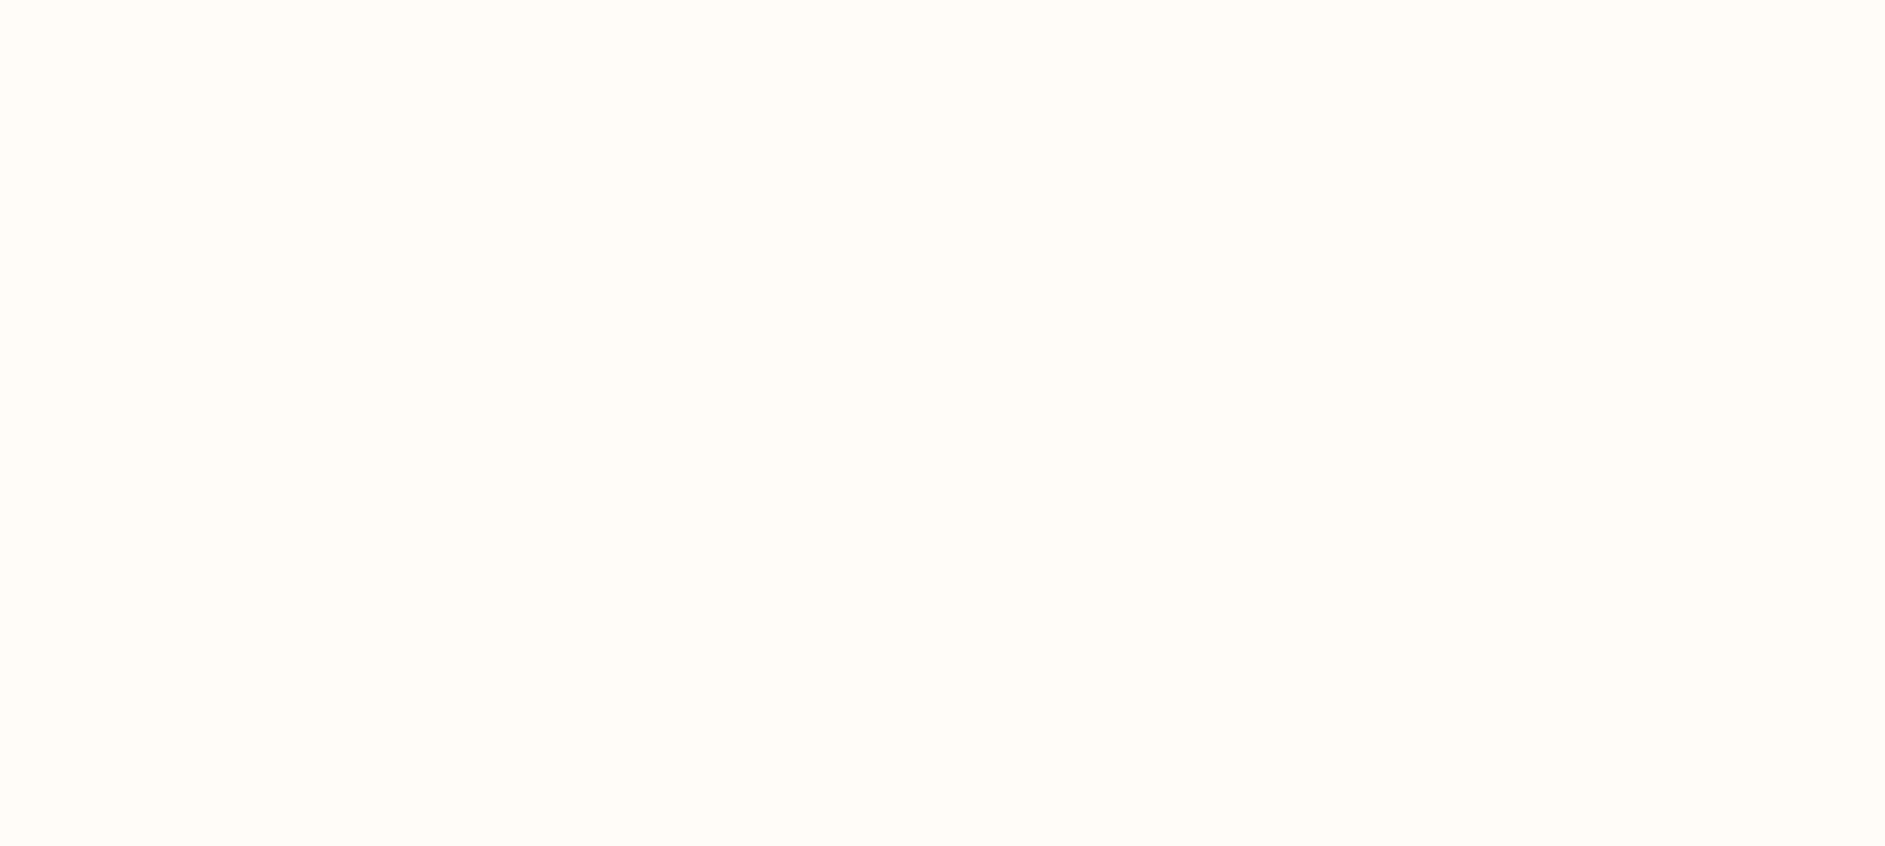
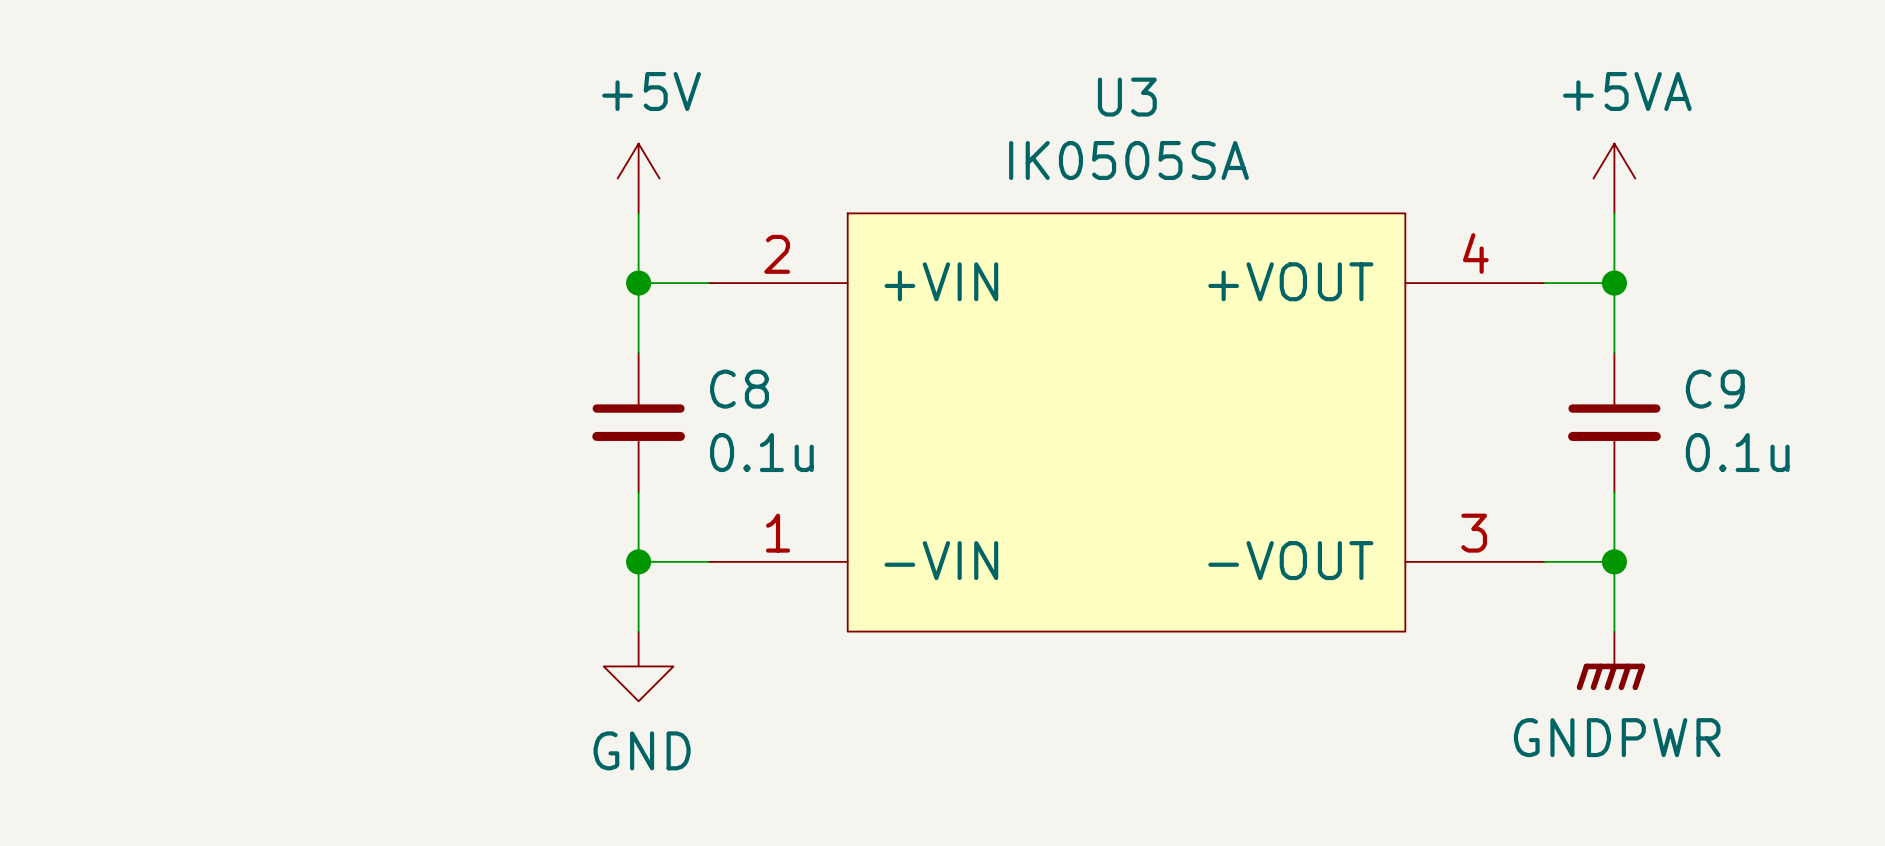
power symbol: none -> +5V (638, 178)
power symbol: none -> +5VA (1614, 178)
wire: none -> (638, 213) (638, 352)
wire: none -> (1614, 213) (1614, 352)
wire: none -> (638, 283) (708, 283)
junction: none -> (638, 283)
wire: none -> (1544, 283) (1614, 283)
junction: none -> (1614, 283)
C8: none -> 0.1u (638, 422)
U3: none -> IK0505SA (1126, 422)
C9: none -> 0.1u (1614, 422)
wire: none -> (638, 492) (638, 631)
wire: none -> (1614, 492) (1614, 631)
wire: none -> (638, 561) (708, 561)
junction: none -> (638, 561)
wire: none -> (1544, 561) (1614, 561)
junction: none -> (1614, 561)
power symbol: none -> GNDPWR (1610, 660)
power symbol: none -> GND (638, 666)

